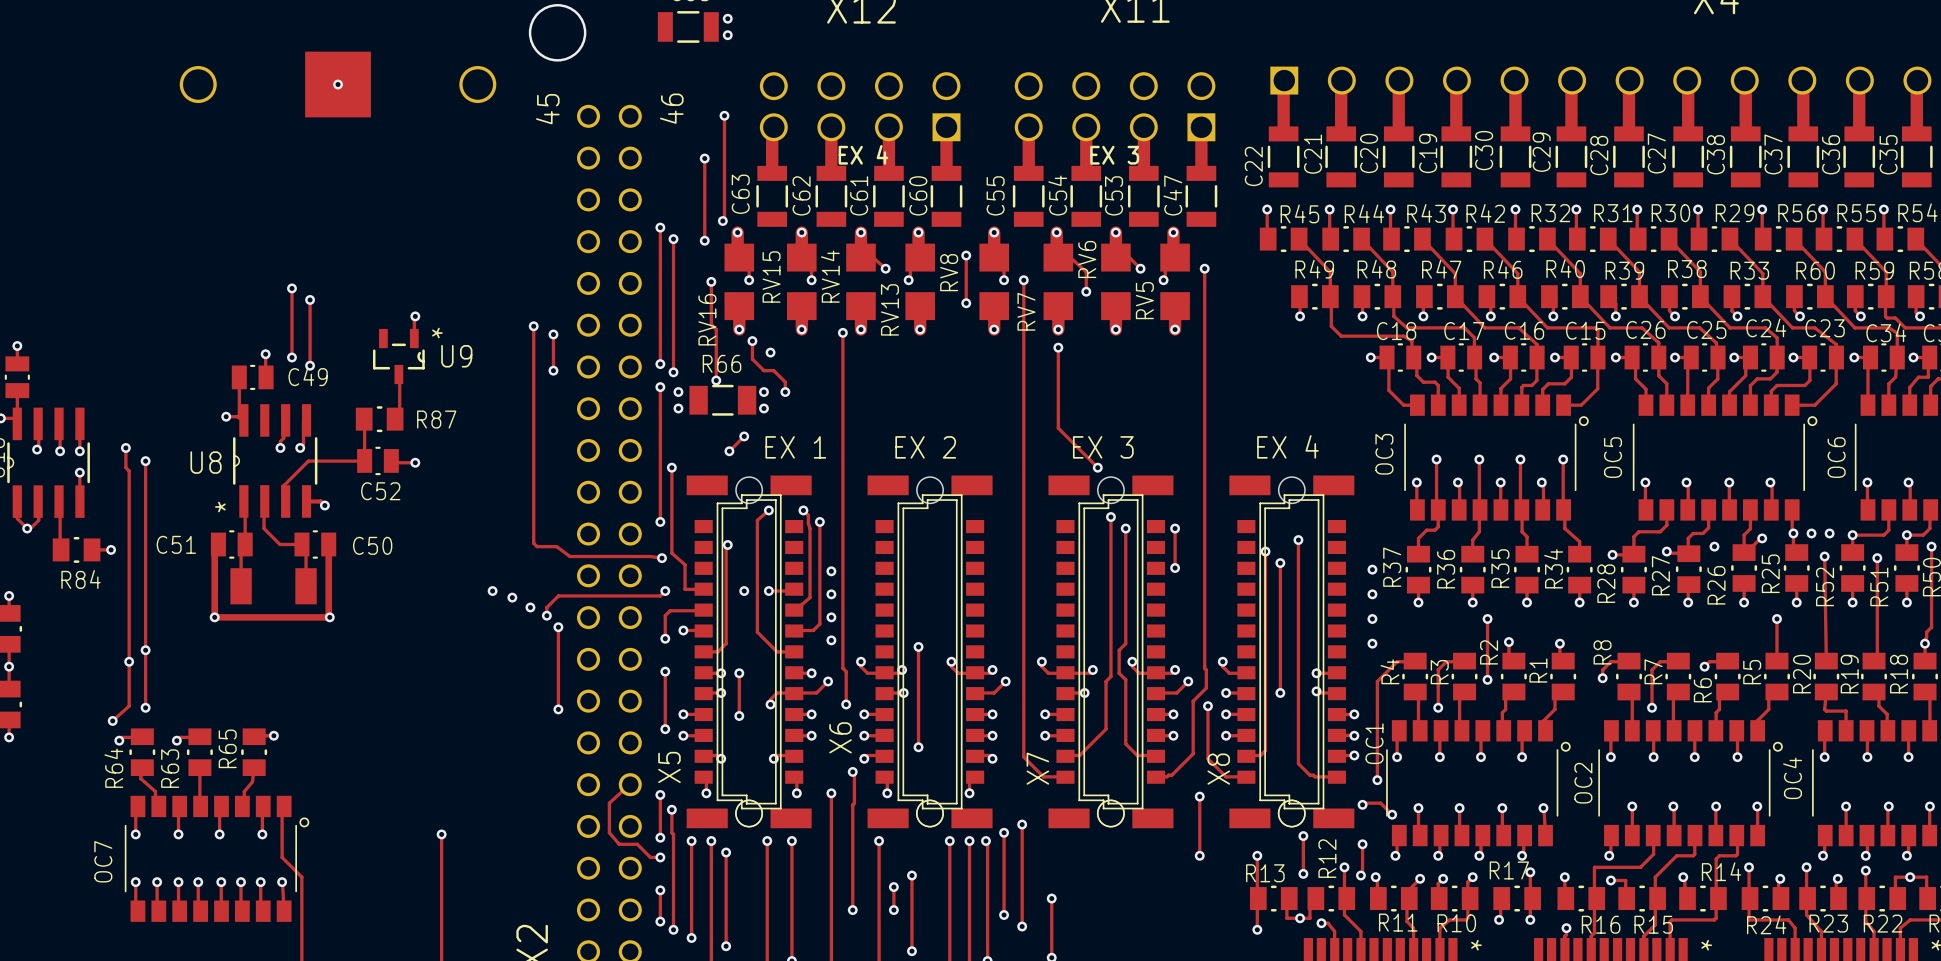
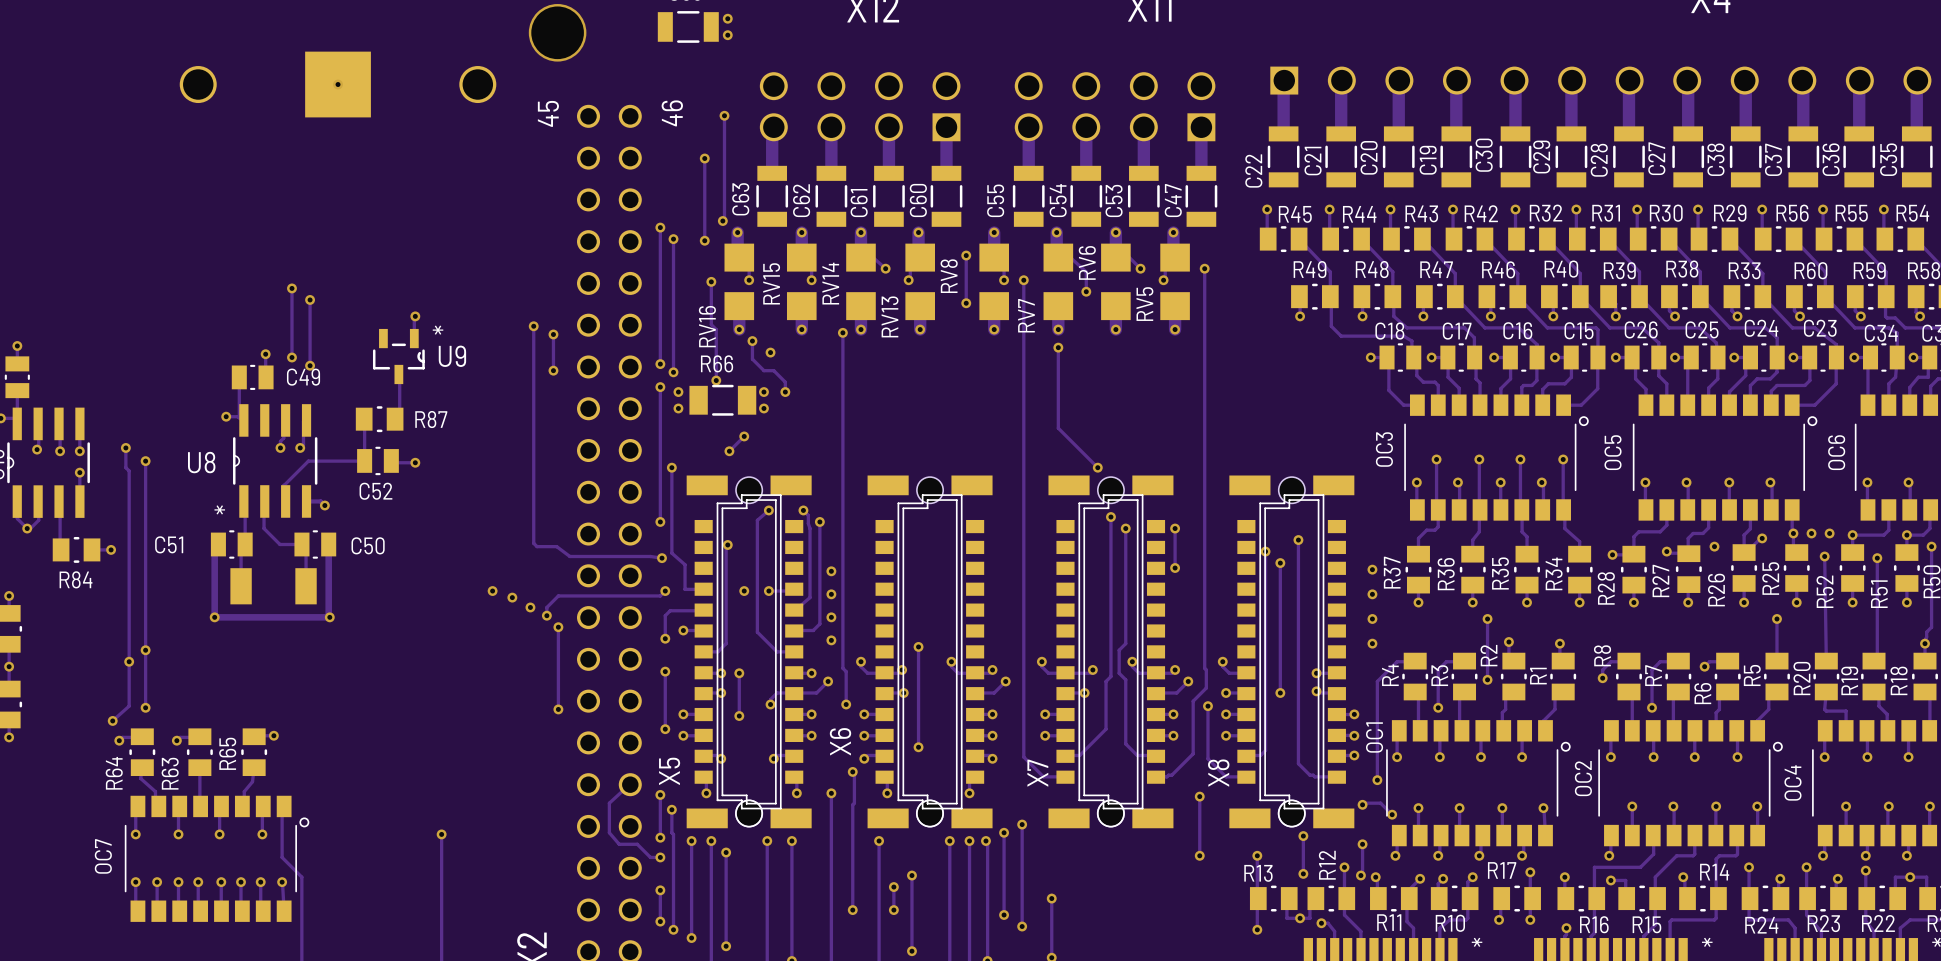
text: EX 4 (863, 154) -> none
text: EX 3 (1114, 155) -> none
text: EX 4 (1287, 446) -> none
text: EX 1 (795, 447) -> none
text: EX 2 (925, 447) -> none
text: EX 3 (1103, 447) -> none

